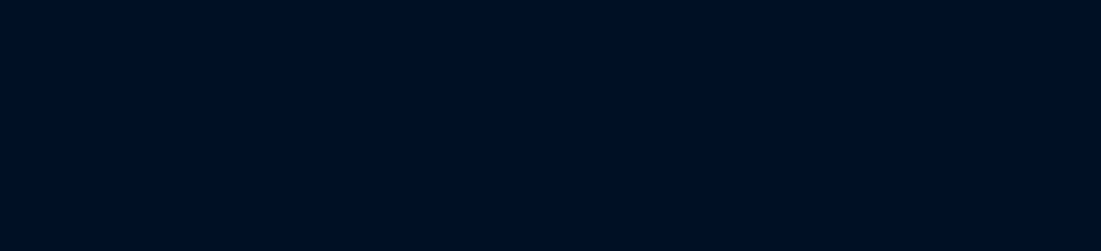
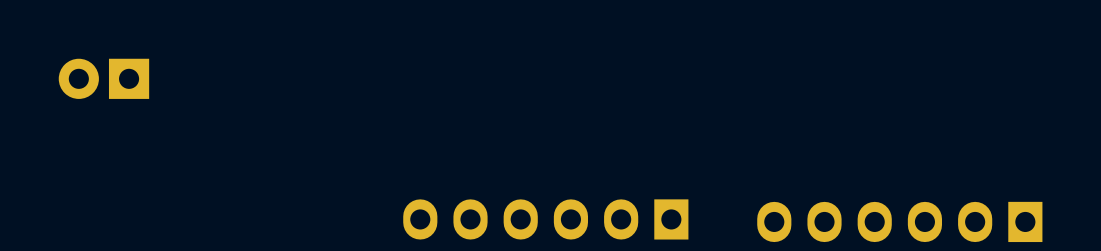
part: none -> (103, 78)
part: none -> (545, 219)
part: none -> (899, 221)

